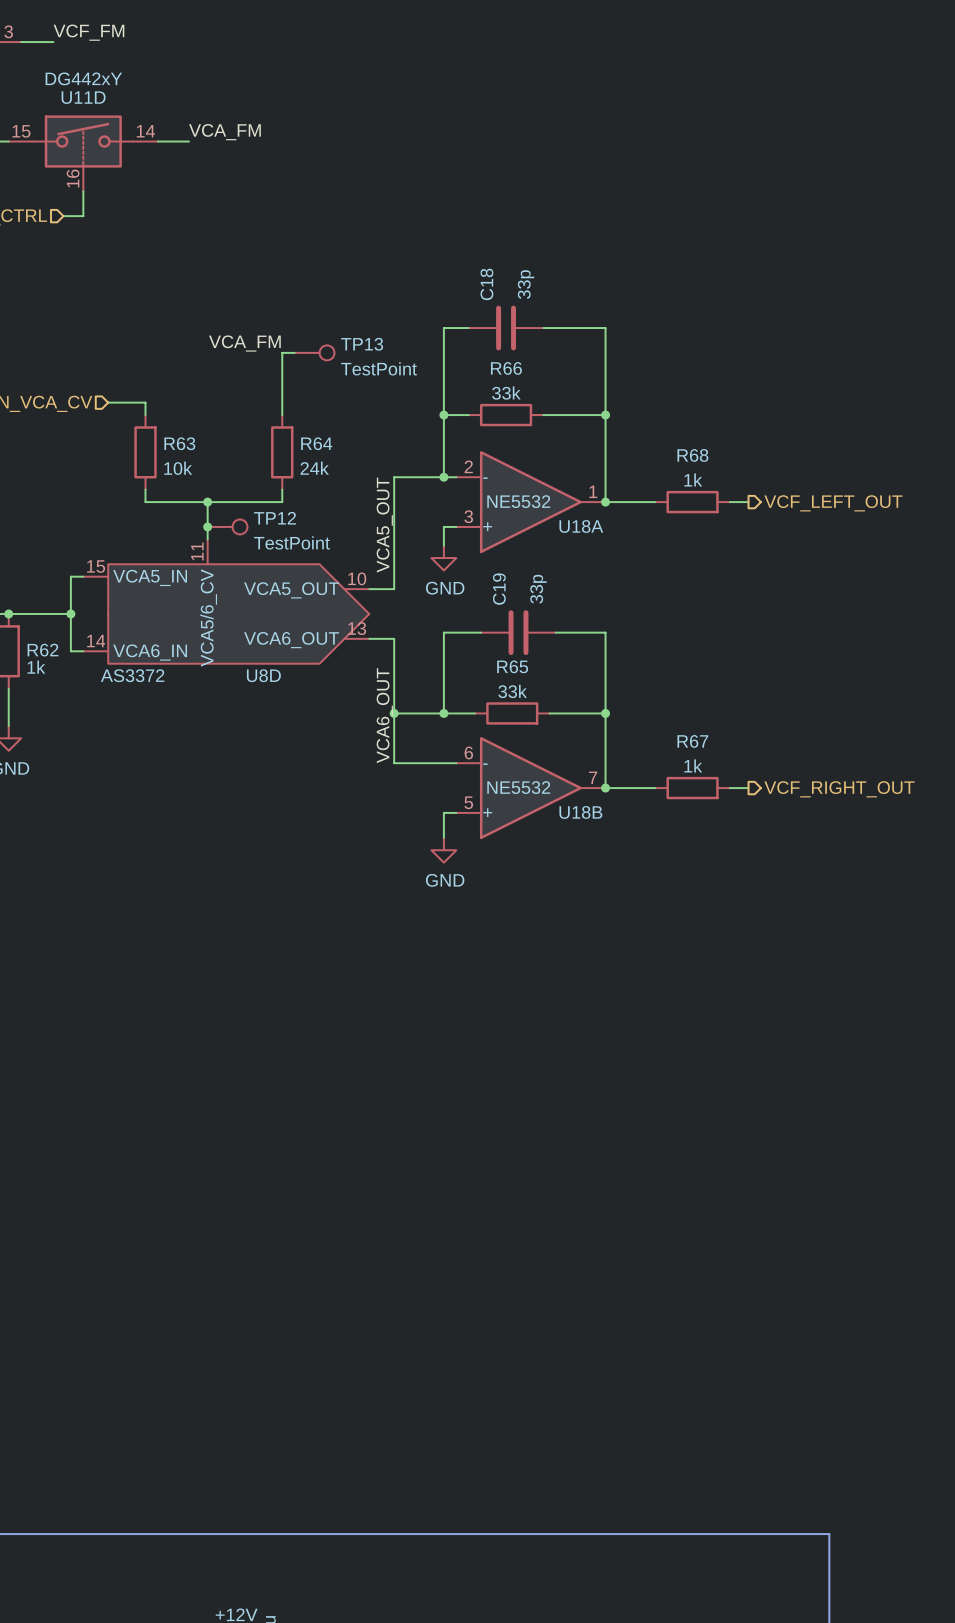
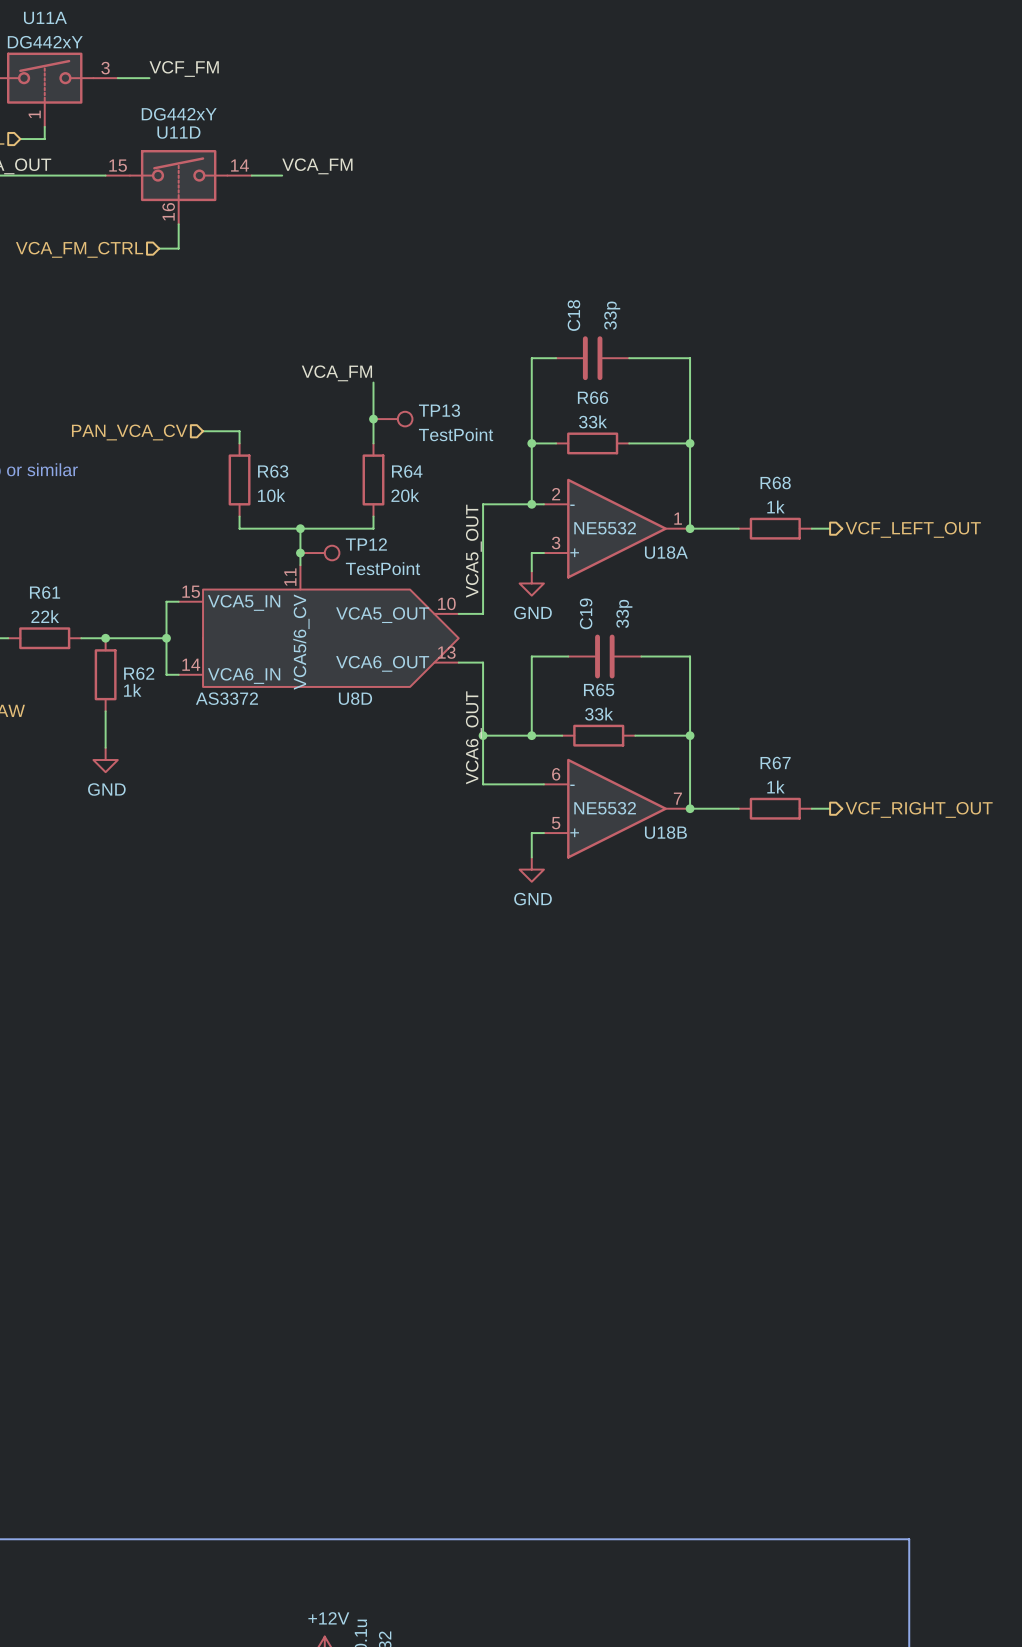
wire: (282, 352) (294, 352) -> none
TP13 position: (314, 352) -> (392, 419)
junction: none -> (373, 419)
R64 value: 24k (314, 468) -> 20k (405, 495)

